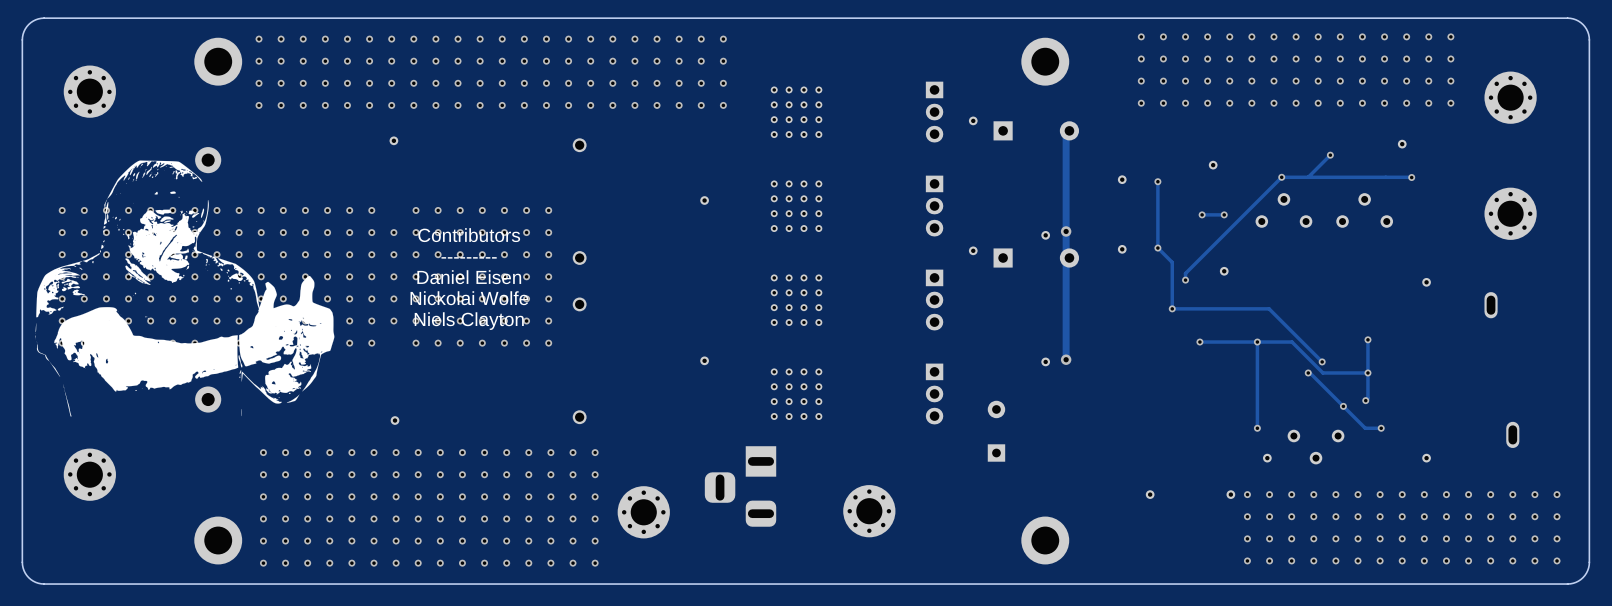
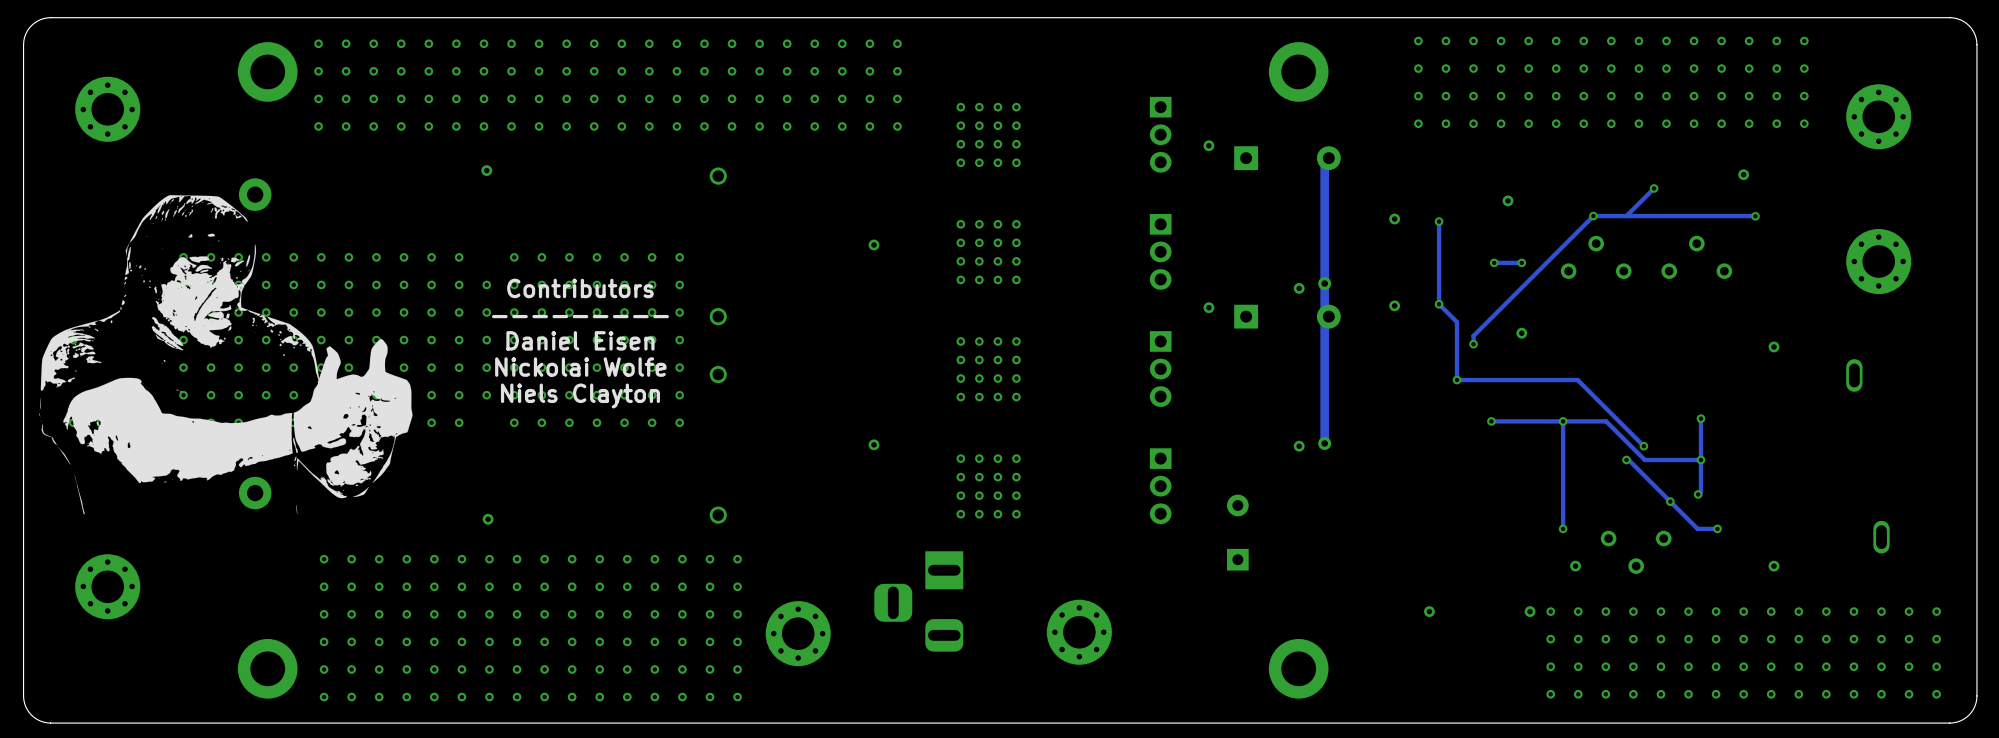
via: (62, 210) -> none
via: (84, 210) -> none
via: (106, 210) -> none
via: (128, 210) -> none
via: (62, 232) -> none
via: (84, 232) -> none
via: (106, 232) -> none
via: (128, 232) -> none
via: (62, 254) -> none
via: (84, 254) -> none
via: (106, 254) -> none
via: (128, 254) -> none
via: (84, 276) -> none
via: (106, 276) -> none
via: (128, 276) -> none
via: (62, 298) -> none
via: (84, 298) -> none
via: (106, 298) -> none
via: (128, 298) -> none
via: (62, 321) -> none
via: (128, 321) -> none

